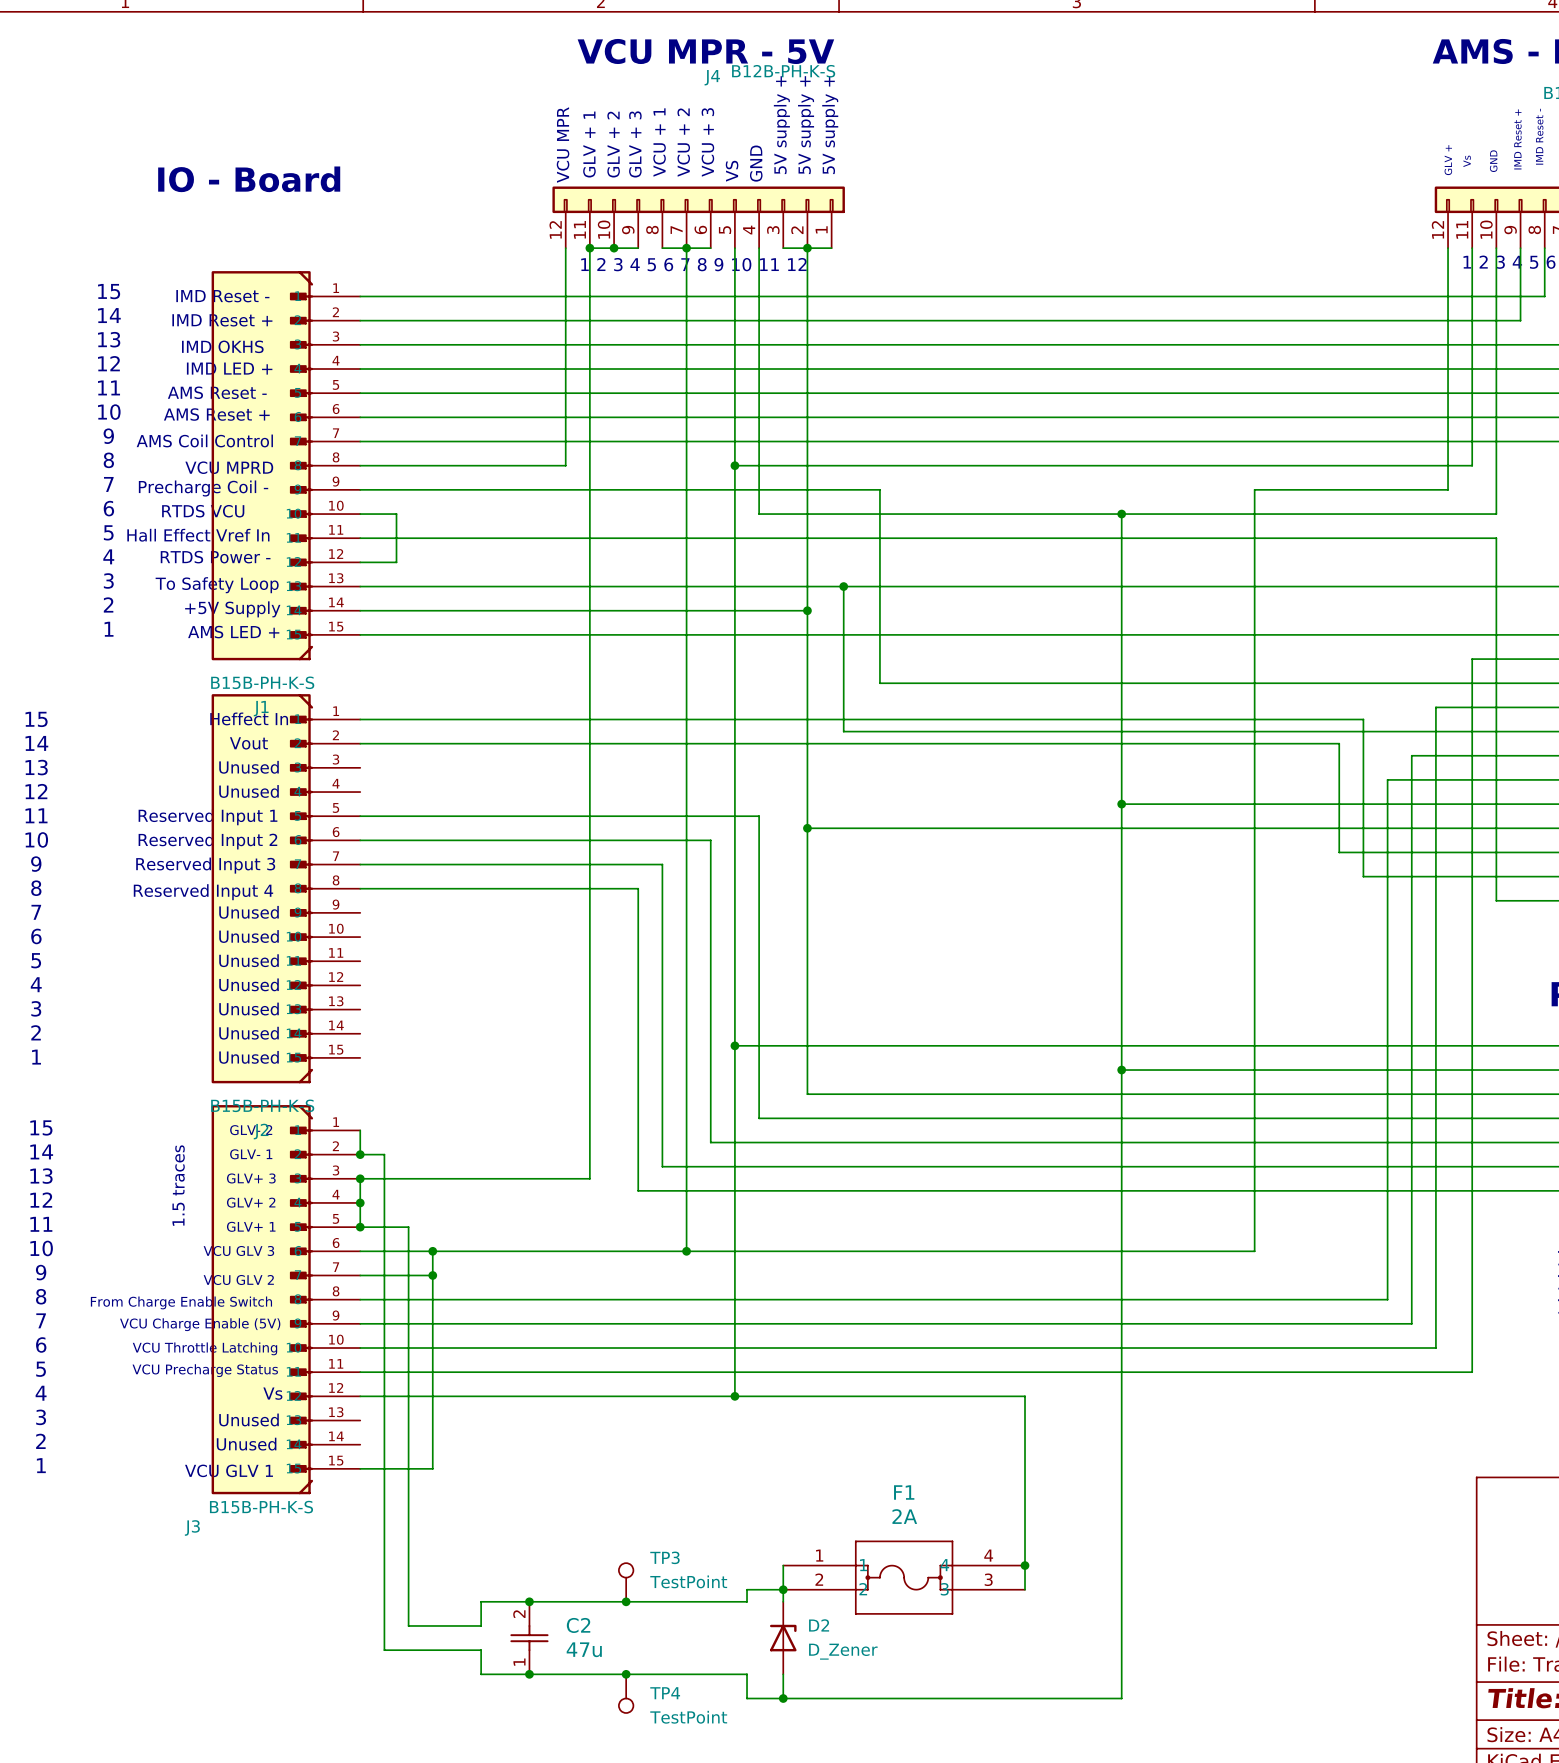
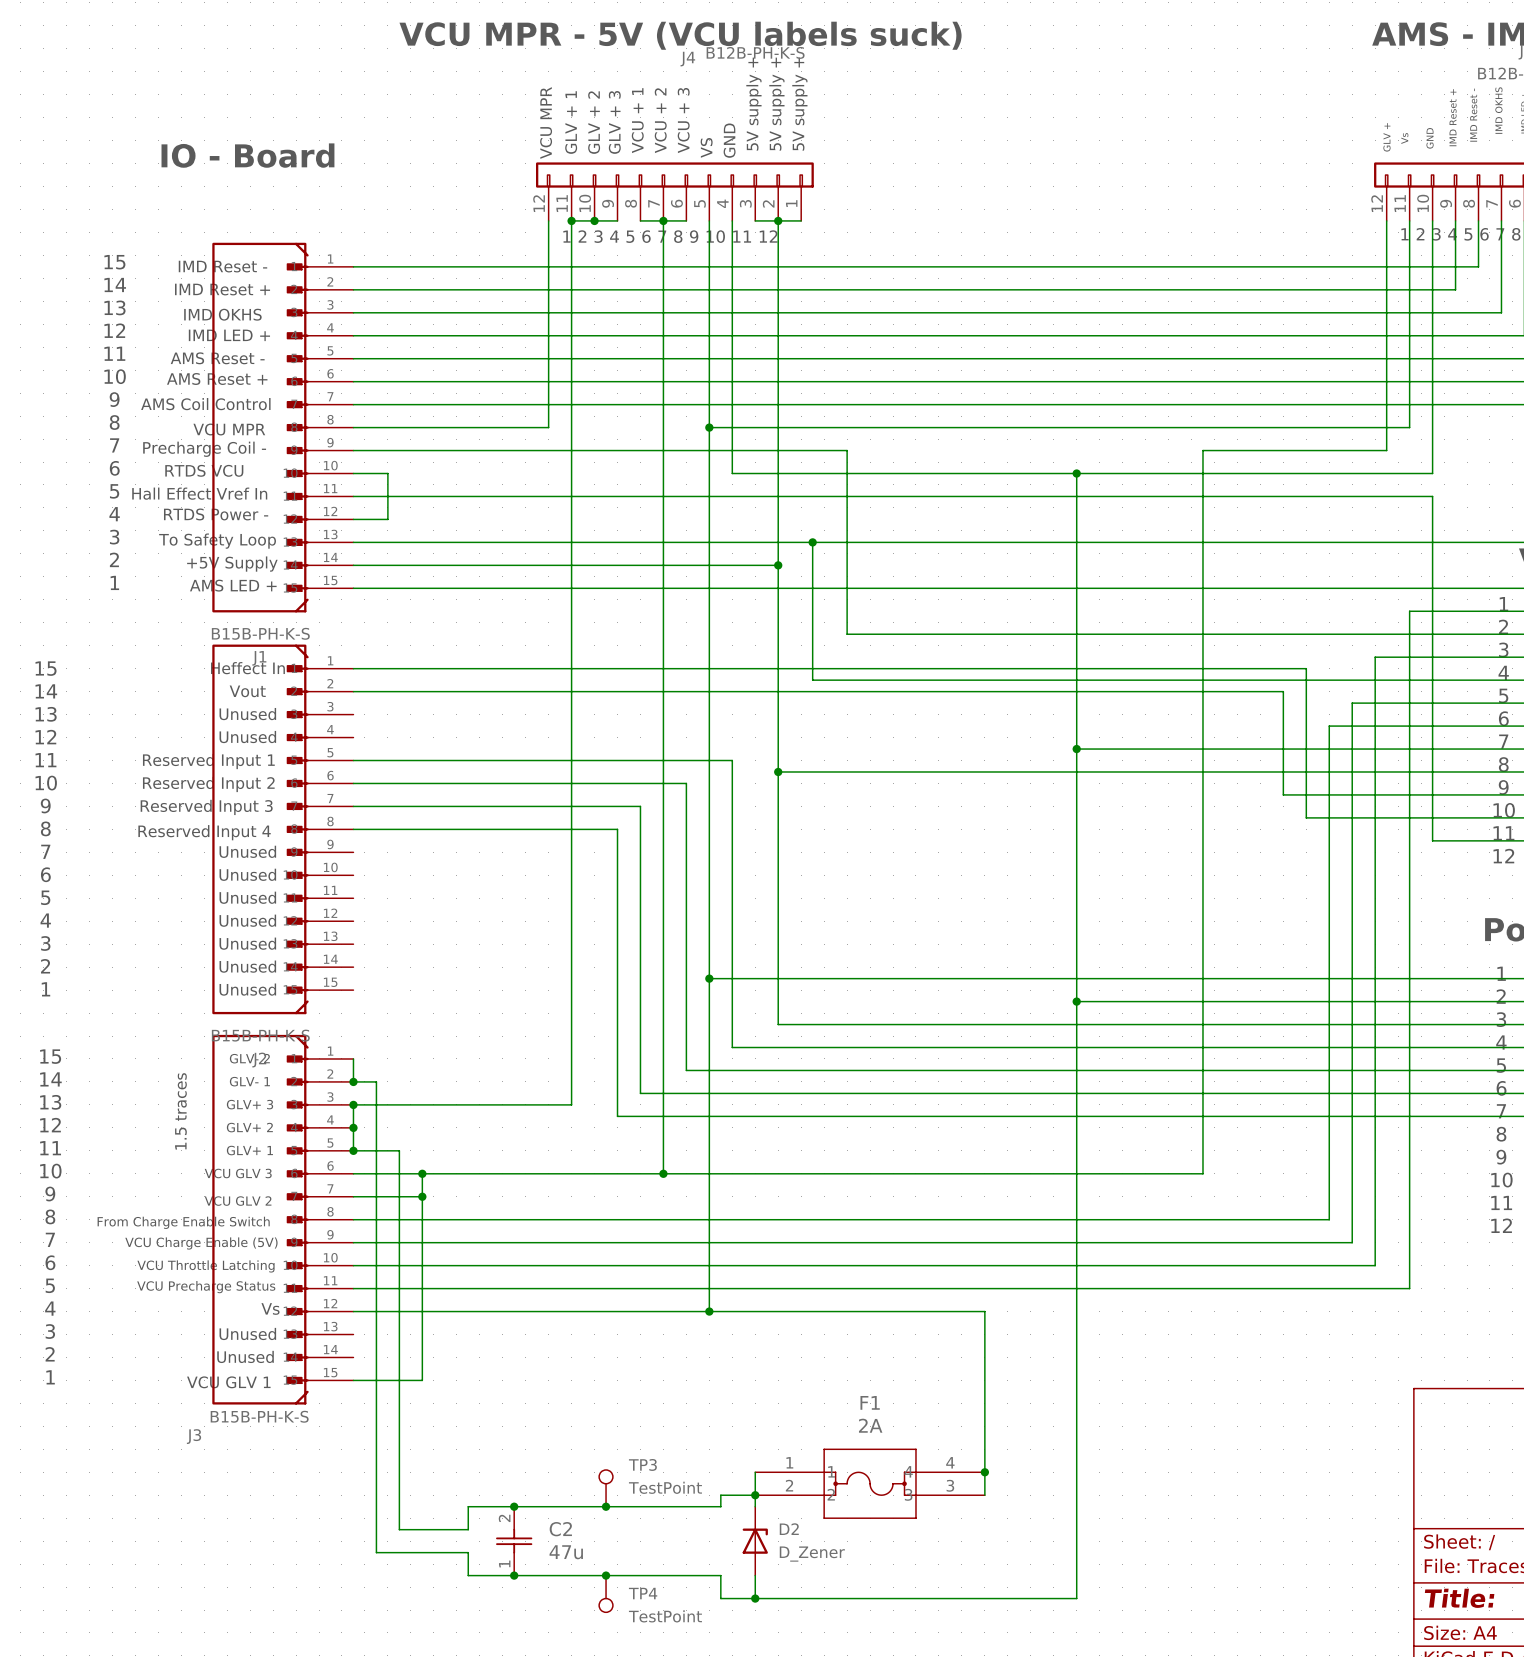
text: VCU MPR - 5V (705, 51) -> VCU MPR - 5V (VCU labels suck) (680, 35)
text: VCU MPRD (229, 467) -> VCU MPR (229, 429)

